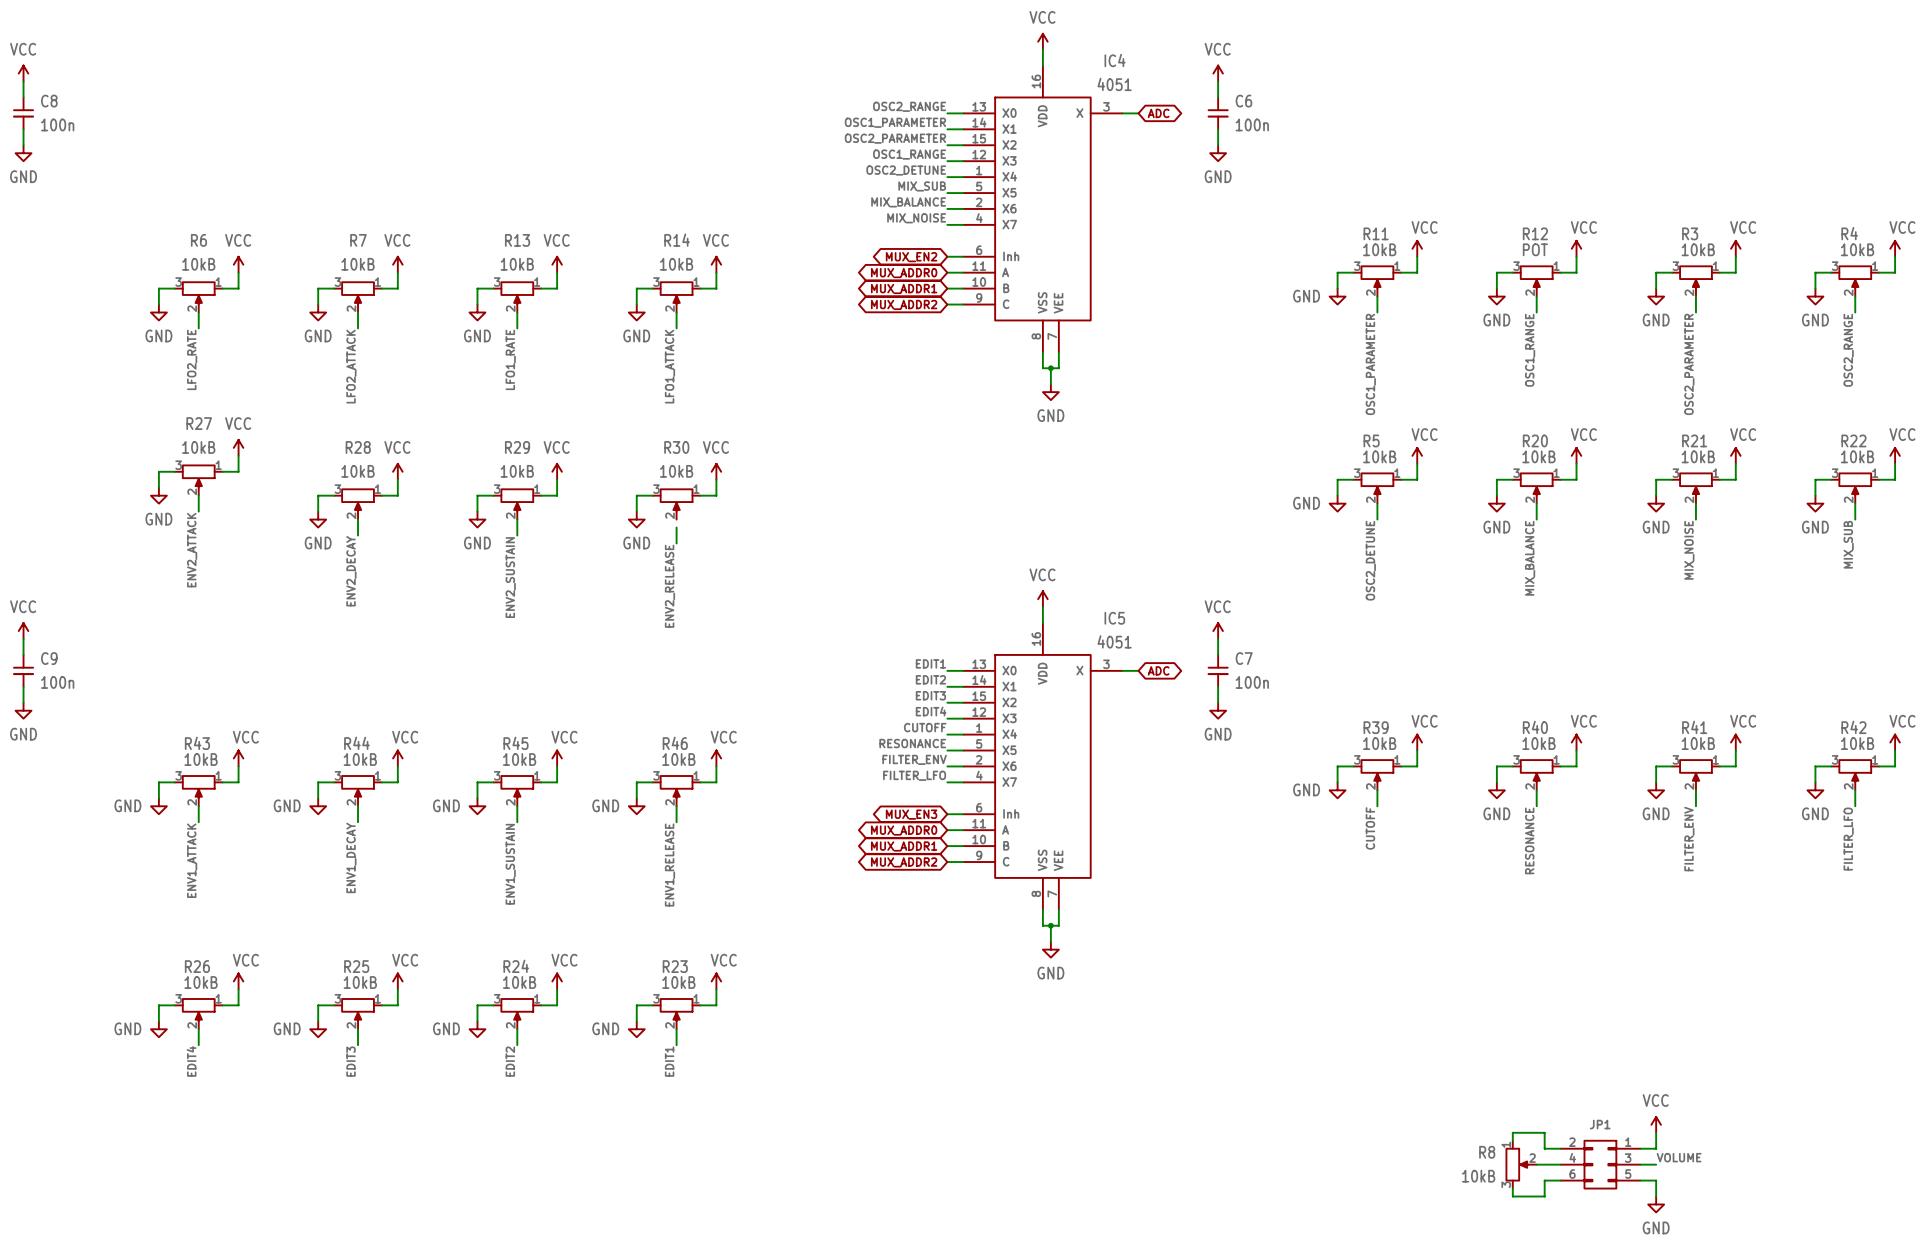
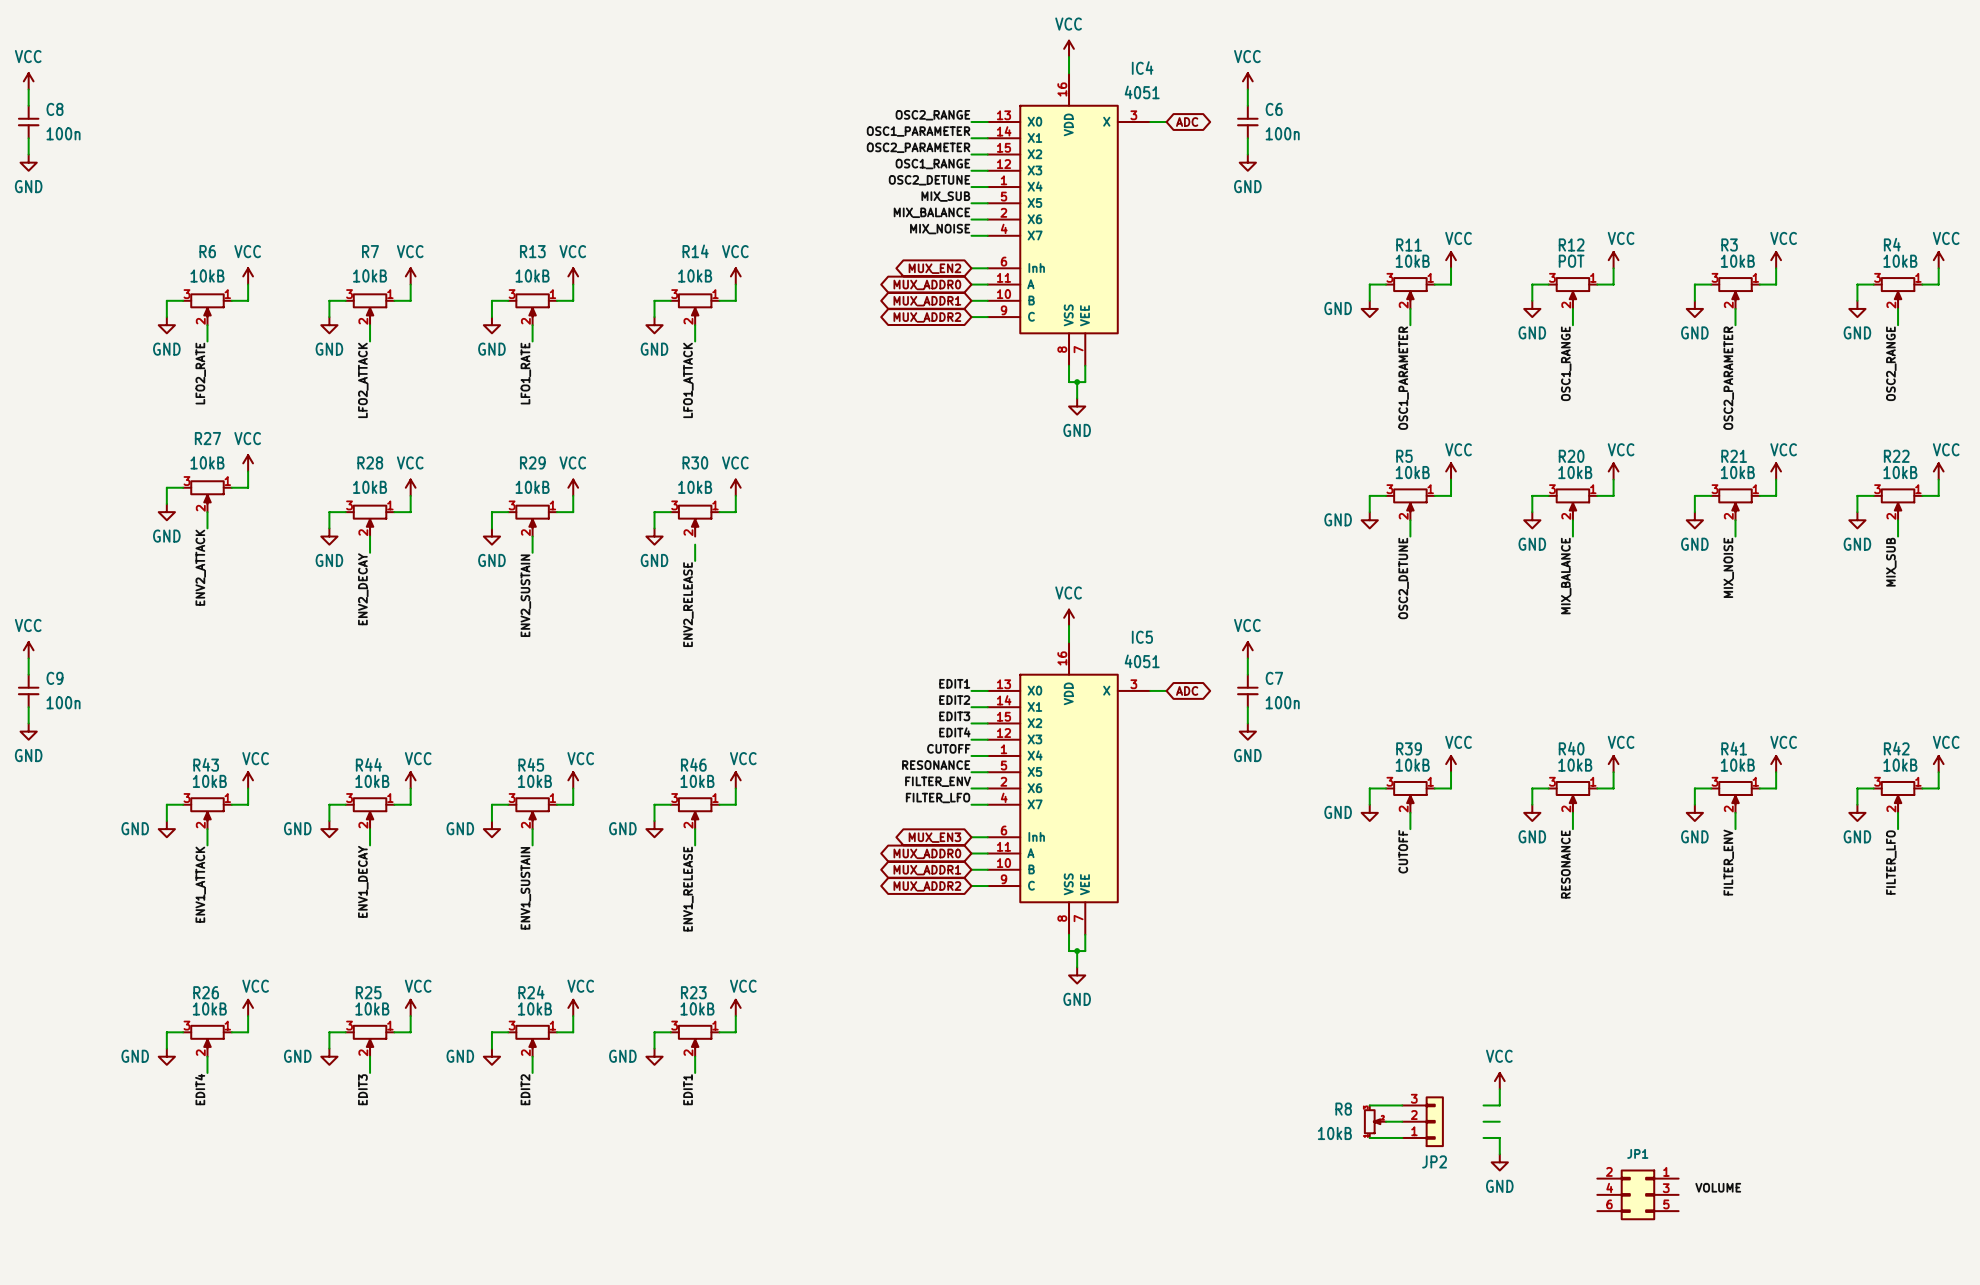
power symbol: none -> VCC (1499, 1081)
wire: none -> (1499, 1089) (1499, 1105) (1483, 1105)
wire: none -> (1369, 1105) (1402, 1105)
wire: none -> (1386, 1121) (1402, 1121)
JP2: none -> (1422, 1121)
wire: none -> (1483, 1121) (1499, 1121)
wire: none -> (1369, 1137) (1402, 1137)
wire: none -> (1483, 1137) (1499, 1137) (1499, 1154)
power symbol: VCC (1656, 1124) -> none
power symbol: none -> GND (1499, 1162)
wire: (1656, 1132) (1656, 1148) (1640, 1148) -> none
R8 symbol: [1505, 1140, 1537, 1189] -> [1364, 1105, 1387, 1138]
wire: (1512, 1140) (1512, 1132) (1544, 1132) (1544, 1148) (1560, 1148) -> none
wire: (1536, 1164) (1560, 1164) -> none
wire: (1640, 1164) (1656, 1164) -> none
wire: (1560, 1180) (1544, 1180) (1544, 1196) (1512, 1196) (1512, 1188) -> none
wire: (1640, 1180) (1656, 1180) (1656, 1196) -> none
power symbol: GND (1656, 1204) -> none

